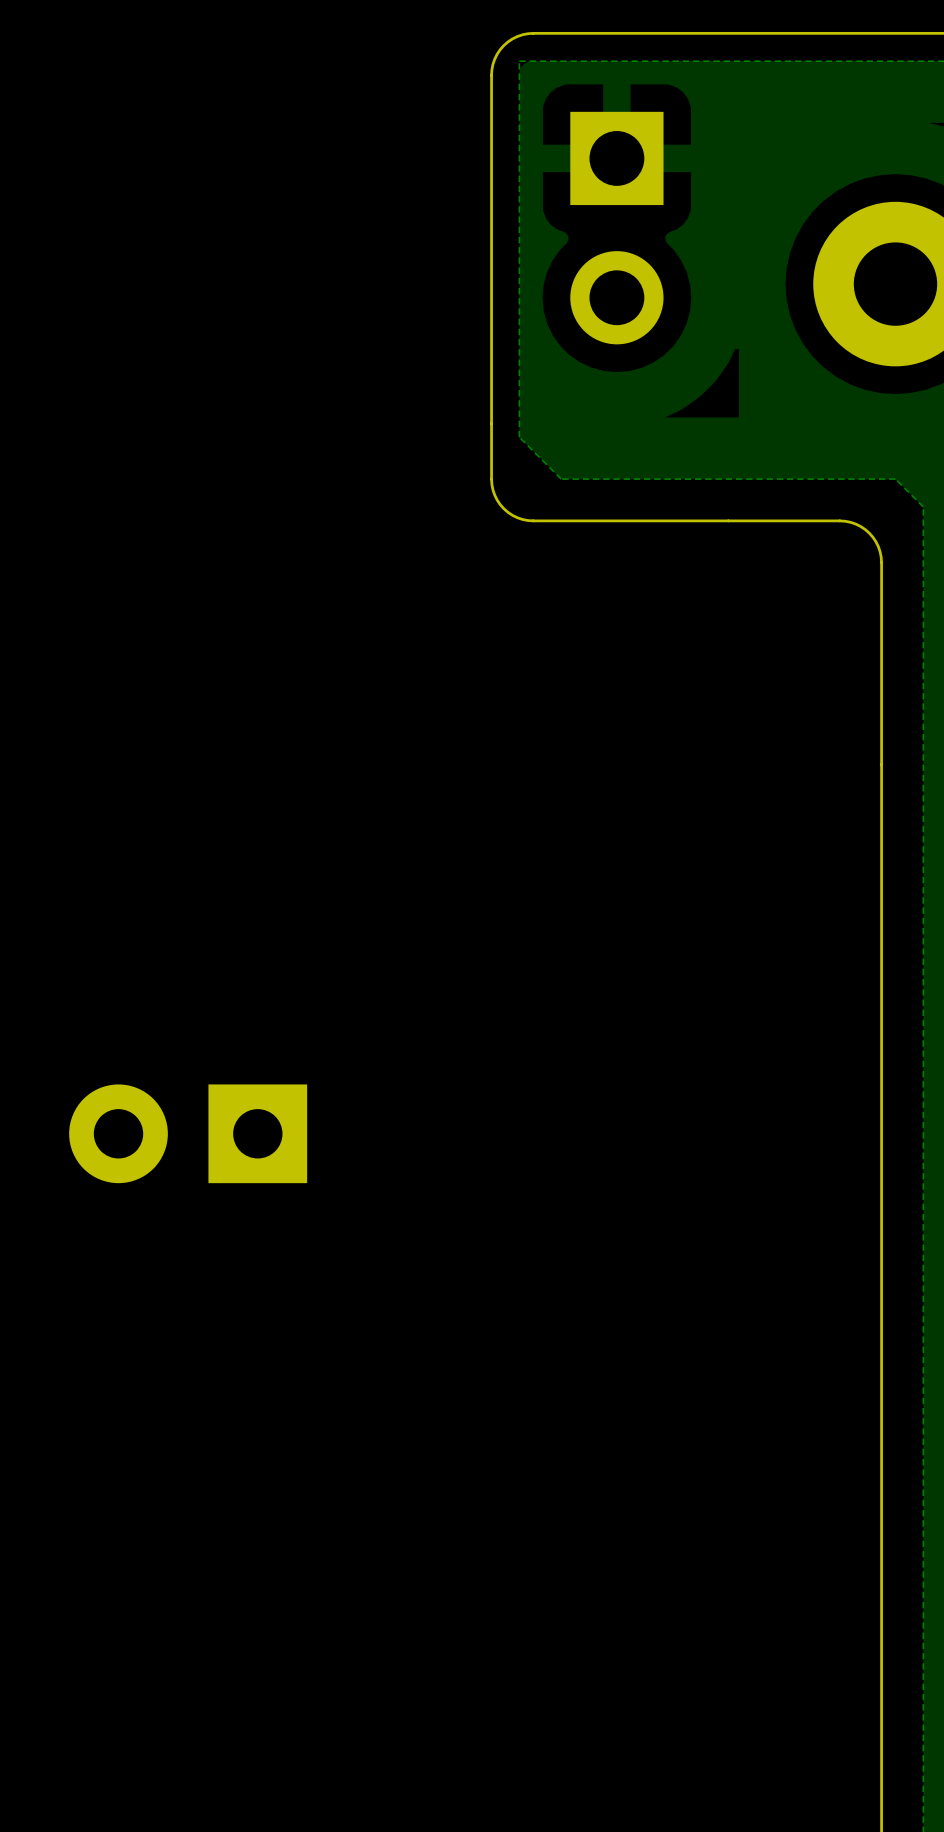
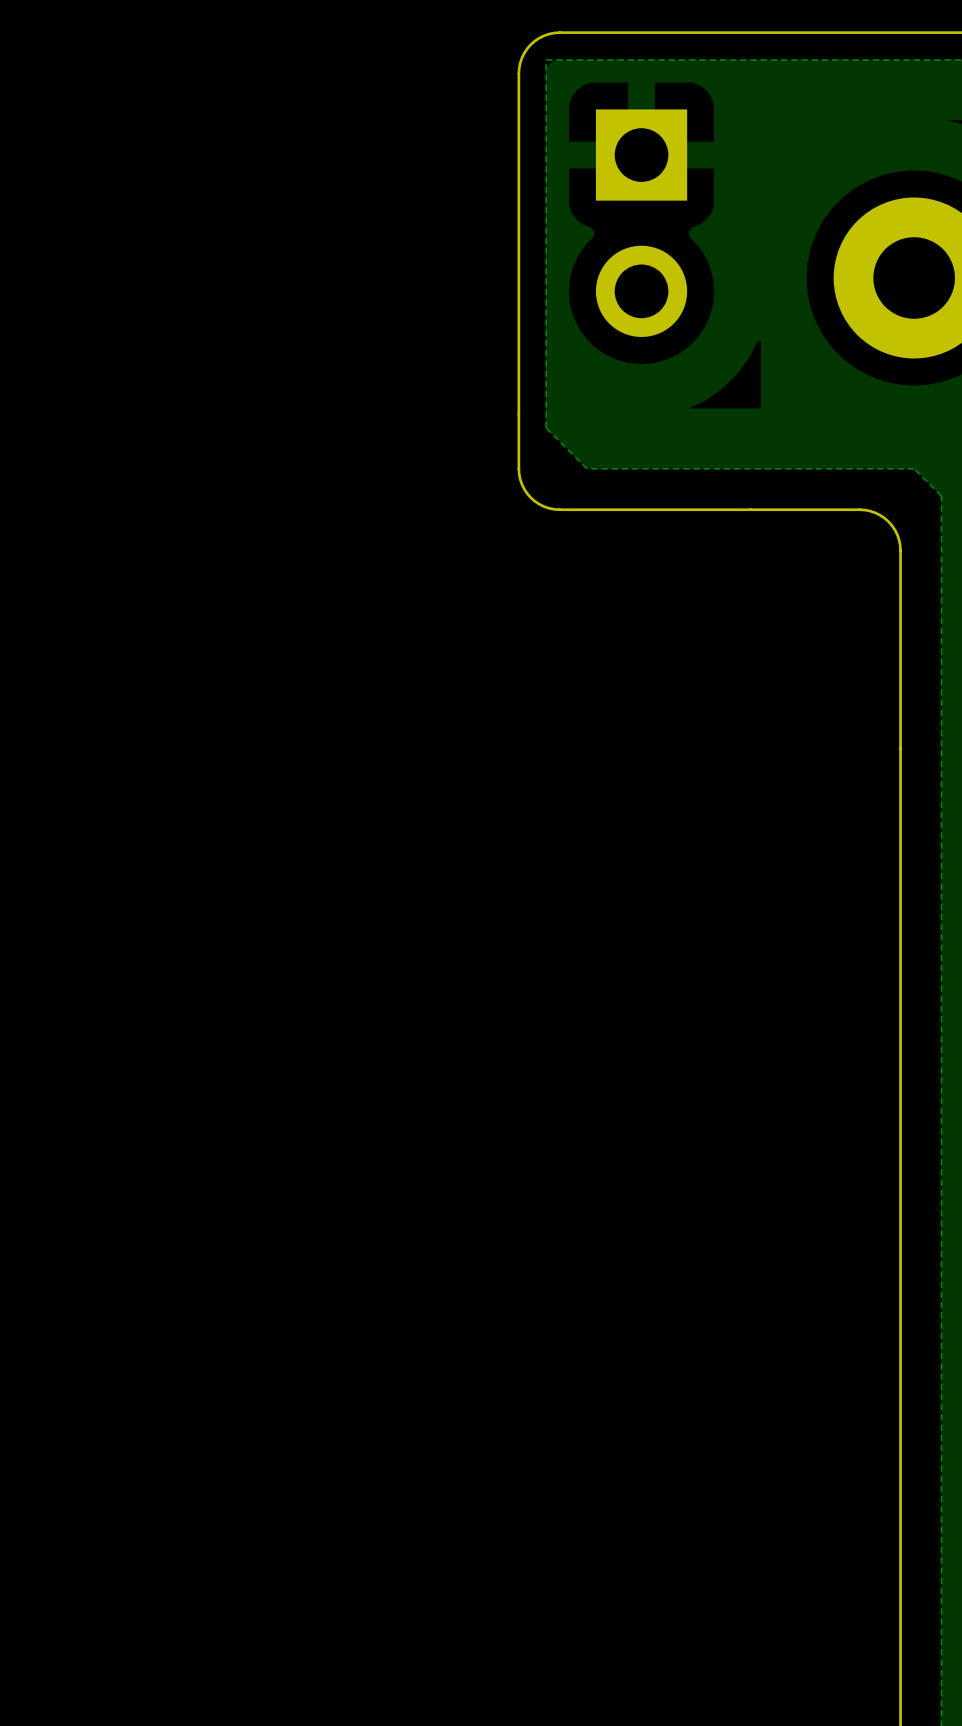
part: (188, 1133) -> none

